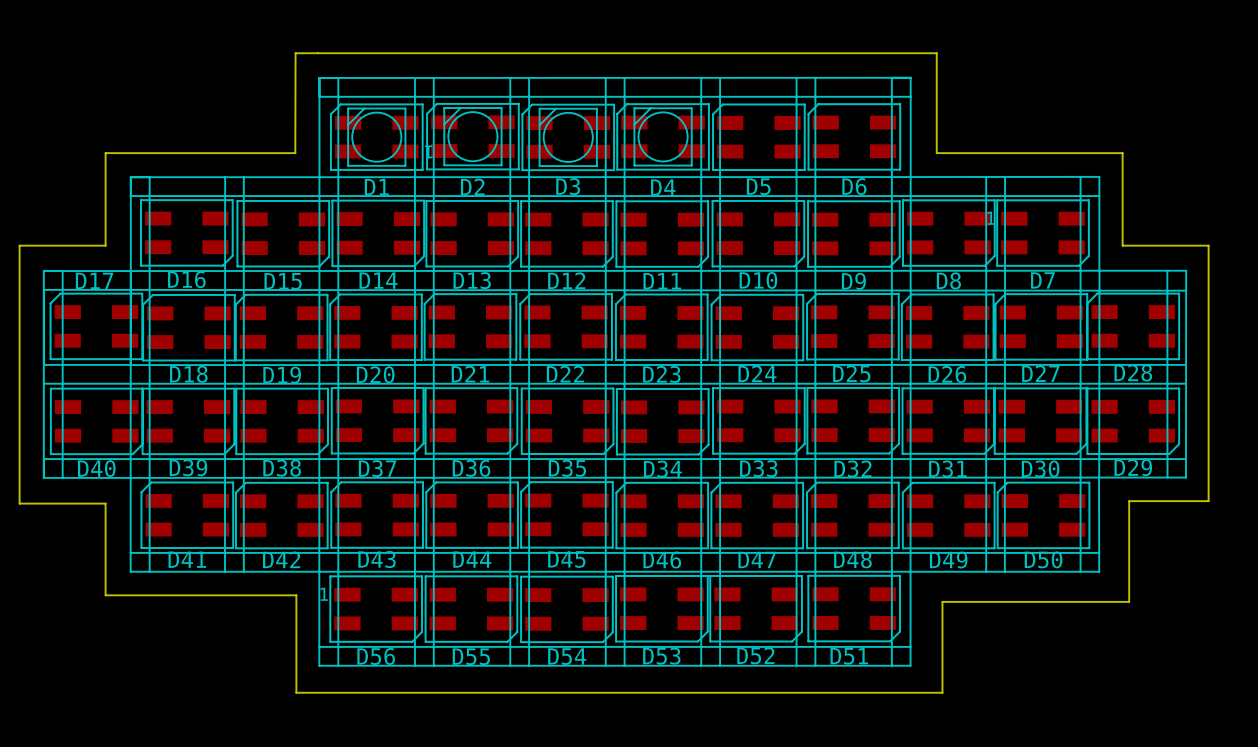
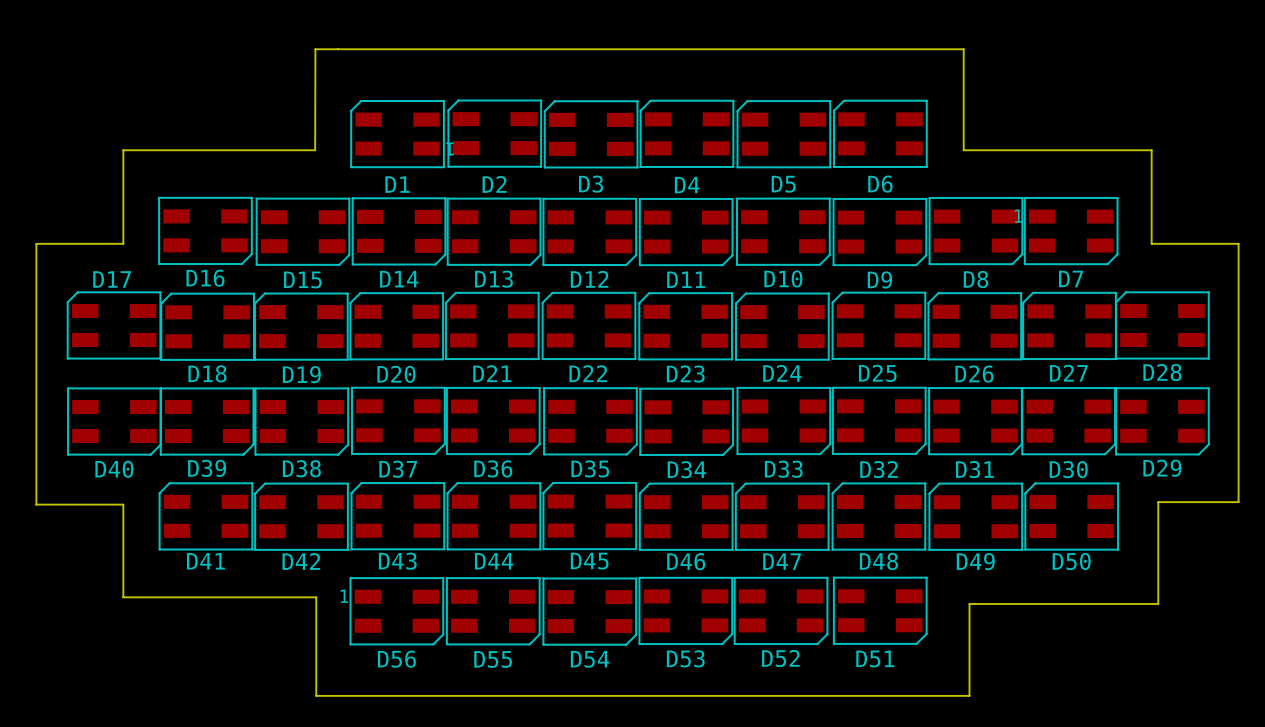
line: (319, 77) (319, 177) -> none
line: (319, 77) (338, 77) (338, 665) -> none
line: (414, 77) (414, 665) -> none
line: (433, 77) (433, 665) -> none
line: (510, 77) (510, 665) -> none
line: (529, 77) (529, 665) -> none
line: (605, 77) (605, 665) -> none
line: (624, 77) (624, 665) -> none
line: (701, 77) (701, 665) -> none
line: (720, 77) (720, 665) -> none
line: (796, 77) (796, 665) -> none
line: (815, 77) (815, 665) -> none
line: (910, 77) (891, 77) (891, 665) -> none
line: (910, 77) (319, 77) -> none
line: (910, 77) (910, 177) -> none
line: (319, 96) (910, 96) -> none
D2 footprint: [426, 102, 520, 171] -> [447, 99, 543, 168]
D1 footprint: [329, 103, 424, 171] -> [350, 100, 445, 169]
D3 footprint: [521, 103, 616, 172] -> [543, 100, 639, 169]
D4 footprint: [616, 103, 710, 171] -> [639, 99, 735, 168]
line: (1005, 176) (1004, 571) -> none
line: (1080, 176) (1080, 571) -> none
line: (149, 177) (149, 571) -> none
line: (225, 177) (224, 571) -> none
line: (243, 177) (243, 571) -> none
line: (319, 177) (130, 177) (130, 289) -> none
line: (910, 177) (319, 177) -> none
line: (910, 177) (910, 665) (319, 665) (319, 177) -> none
line: (910, 177) (1099, 176) (1099, 270) (1186, 270) (1186, 477) (1099, 477) -> none
line: (986, 177) (986, 571) -> none
line: (130, 196) (1099, 196) -> none
line: (1167, 270) (1167, 477) -> none
line: (62, 271) (62, 477) -> none
line: (130, 271) (43, 271) (43, 477) (130, 477) -> none
line: (130, 271) (1099, 270) (1099, 477) -> none
line: (130, 271) (130, 477) -> none
line: (43, 289) (130, 289) -> none
line: (130, 289) (130, 364) (43, 364) -> none
line: (130, 289) (1186, 290) -> none
line: (1186, 364) (130, 365) -> none
line: (43, 383) (1186, 383) -> none
line: (43, 459) (1185, 459) -> none
line: (130, 477) (130, 571) (1099, 571) (1099, 477) -> none
line: (1099, 477) (130, 477) -> none
line: (130, 552) (1099, 552) -> none
line: (319, 646) (910, 646) -> none

